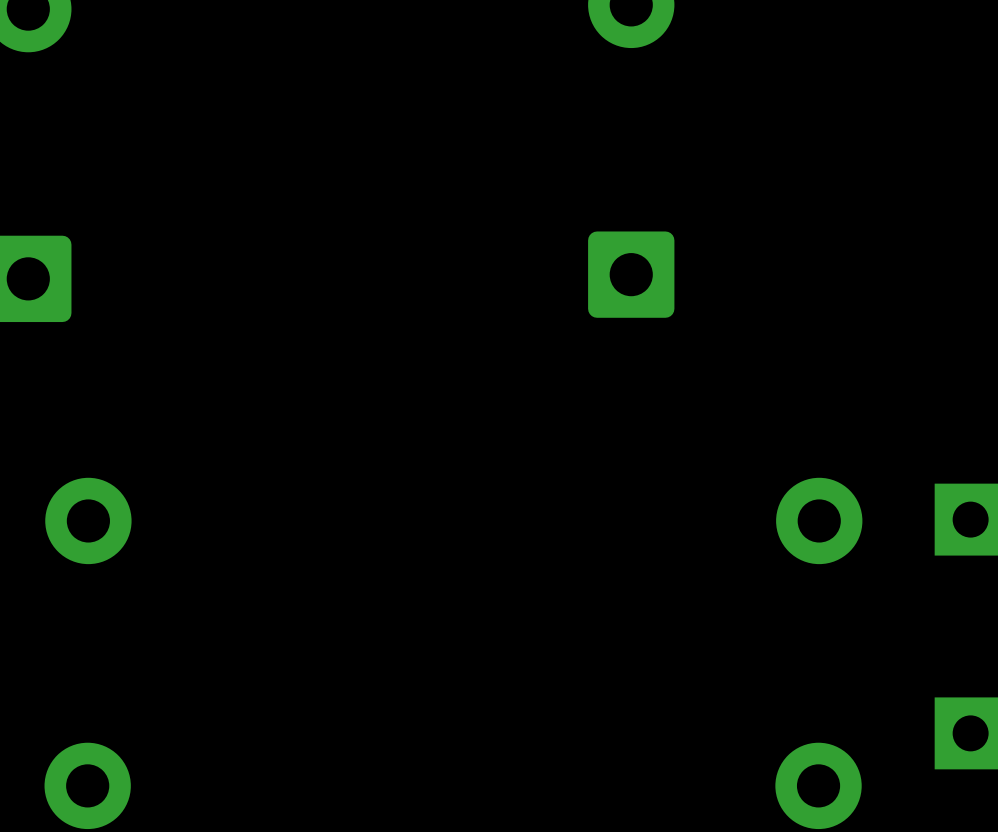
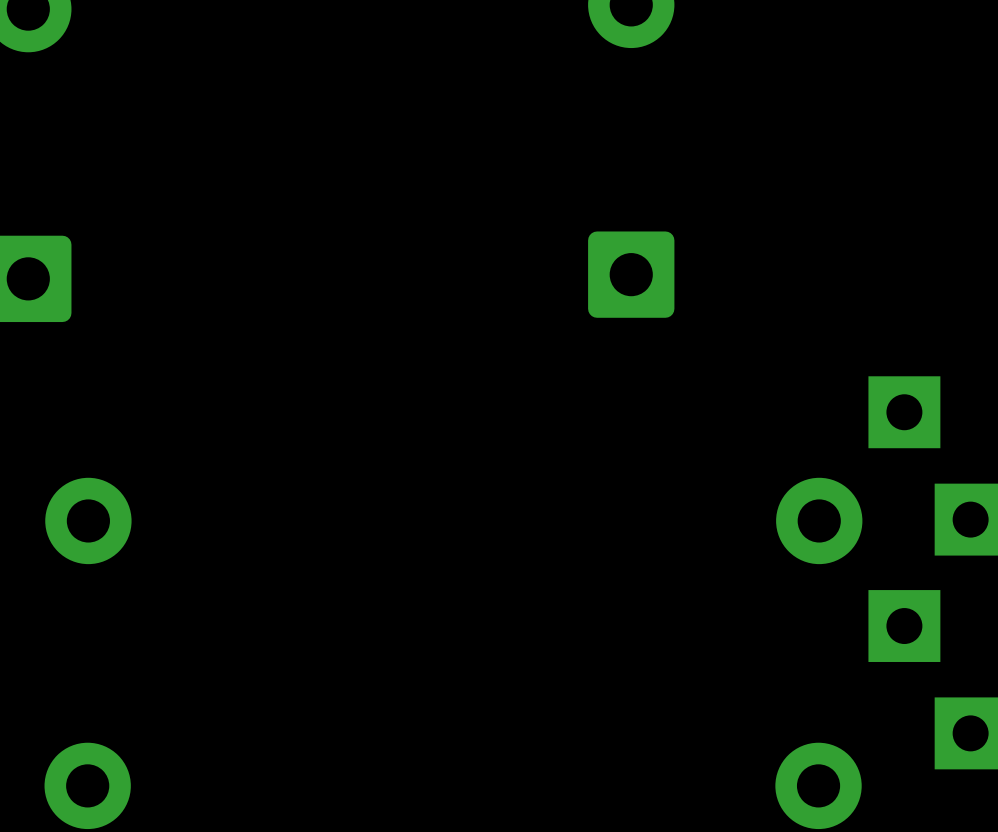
part: none -> (904, 412)
part: none -> (904, 626)

